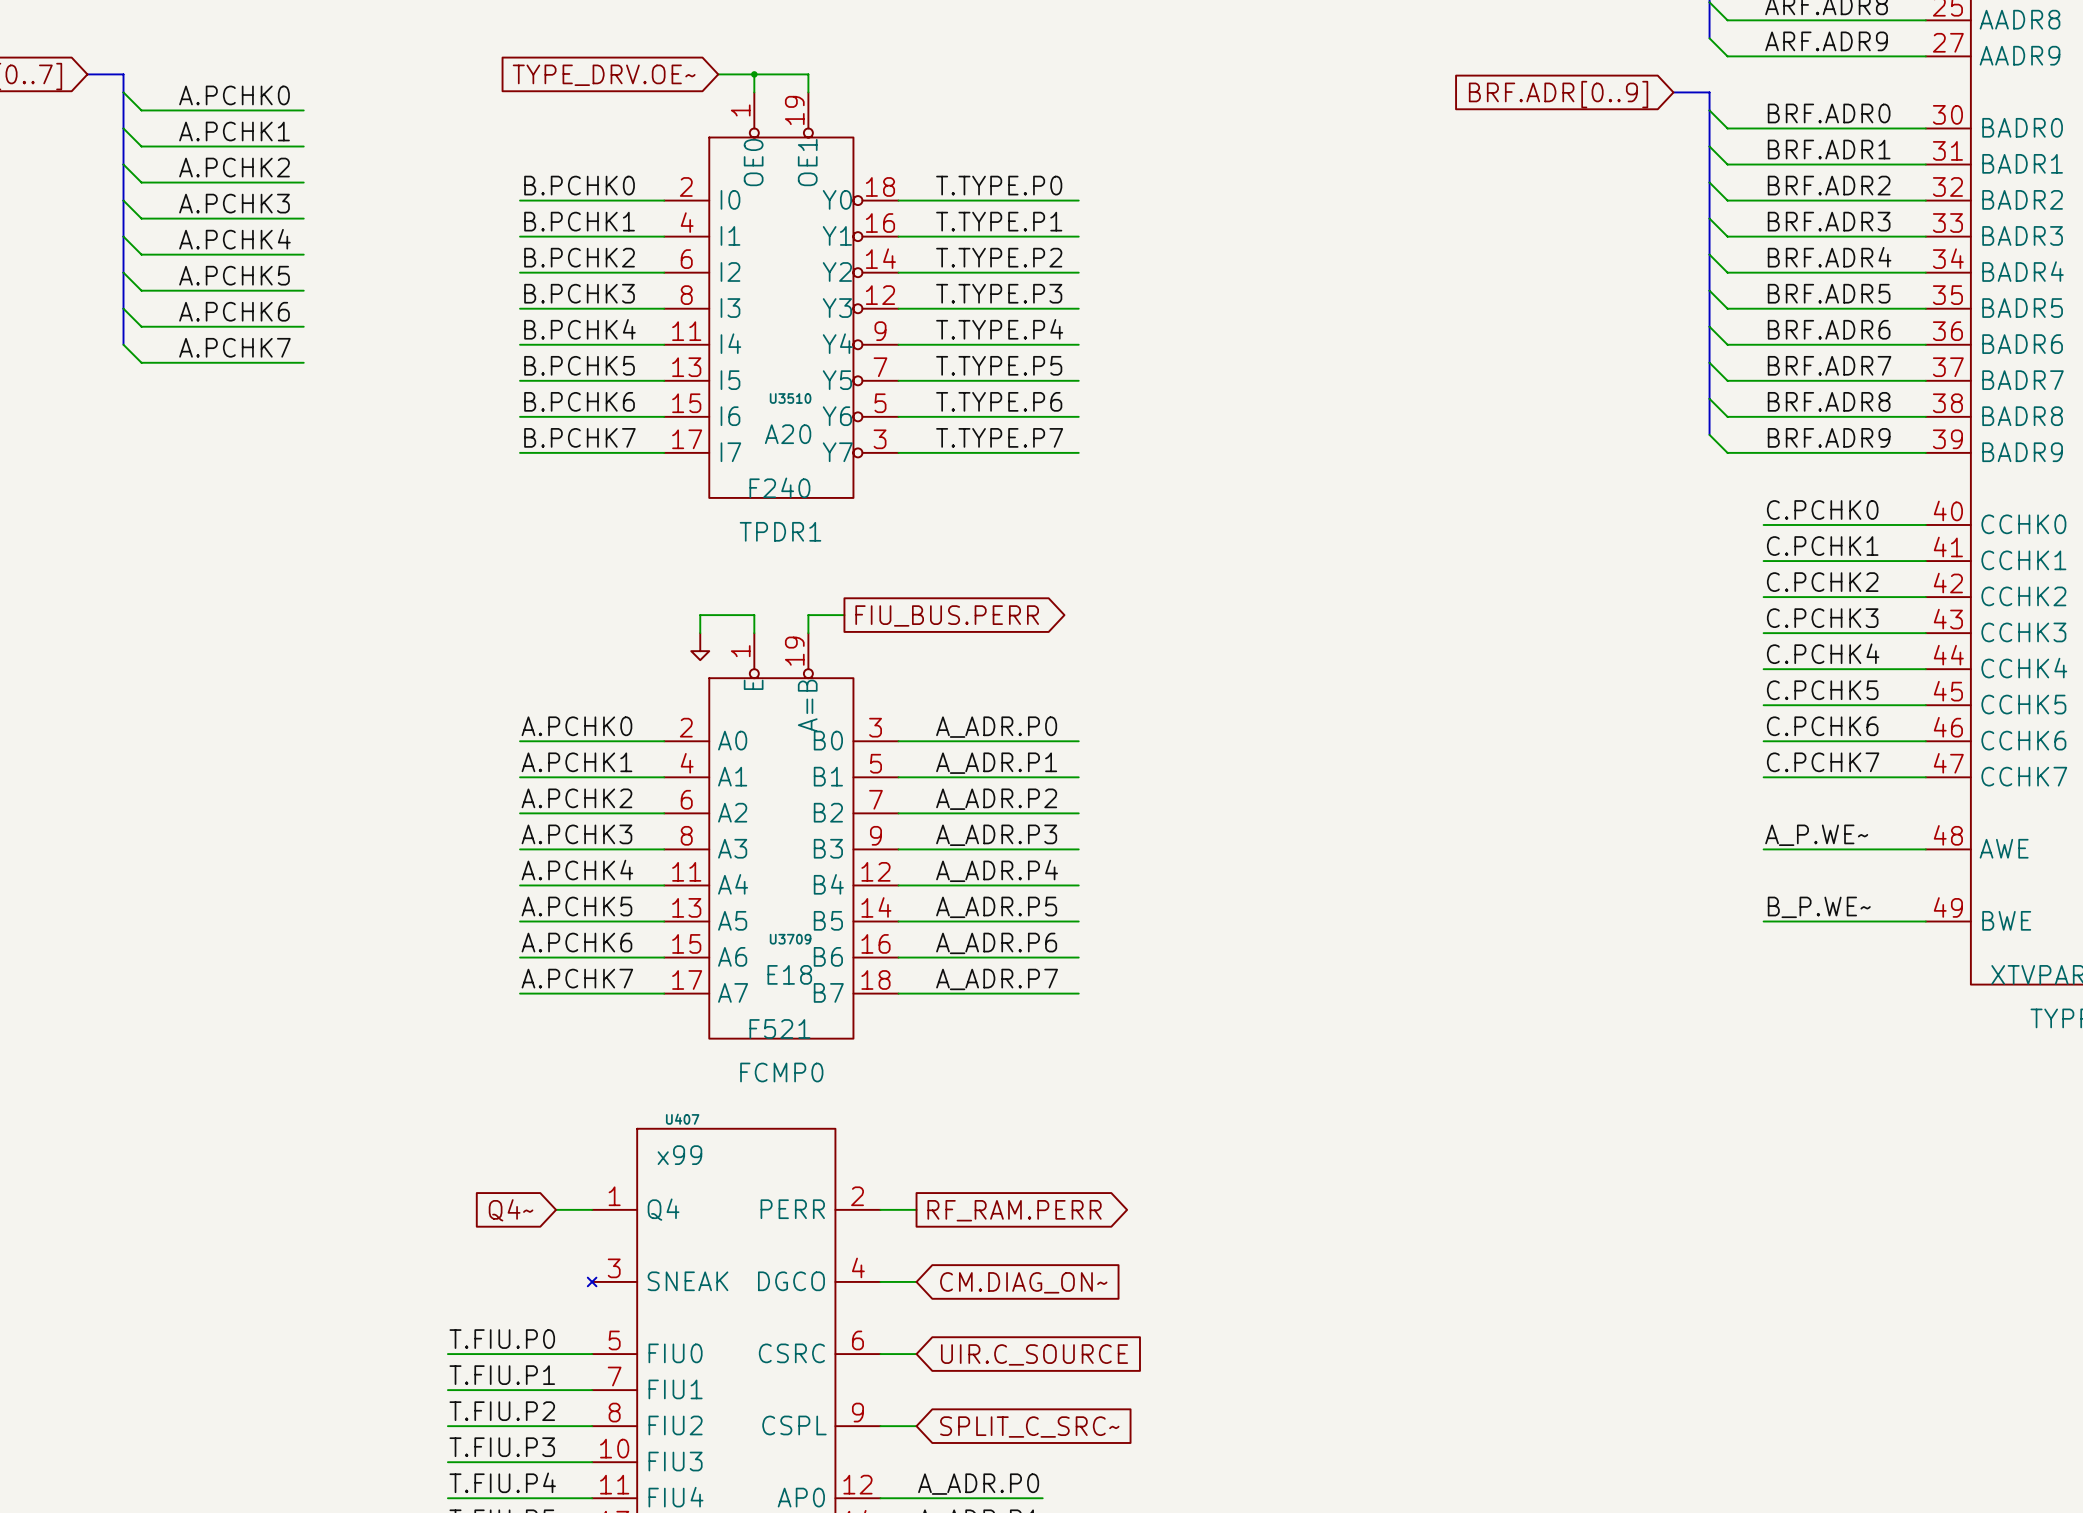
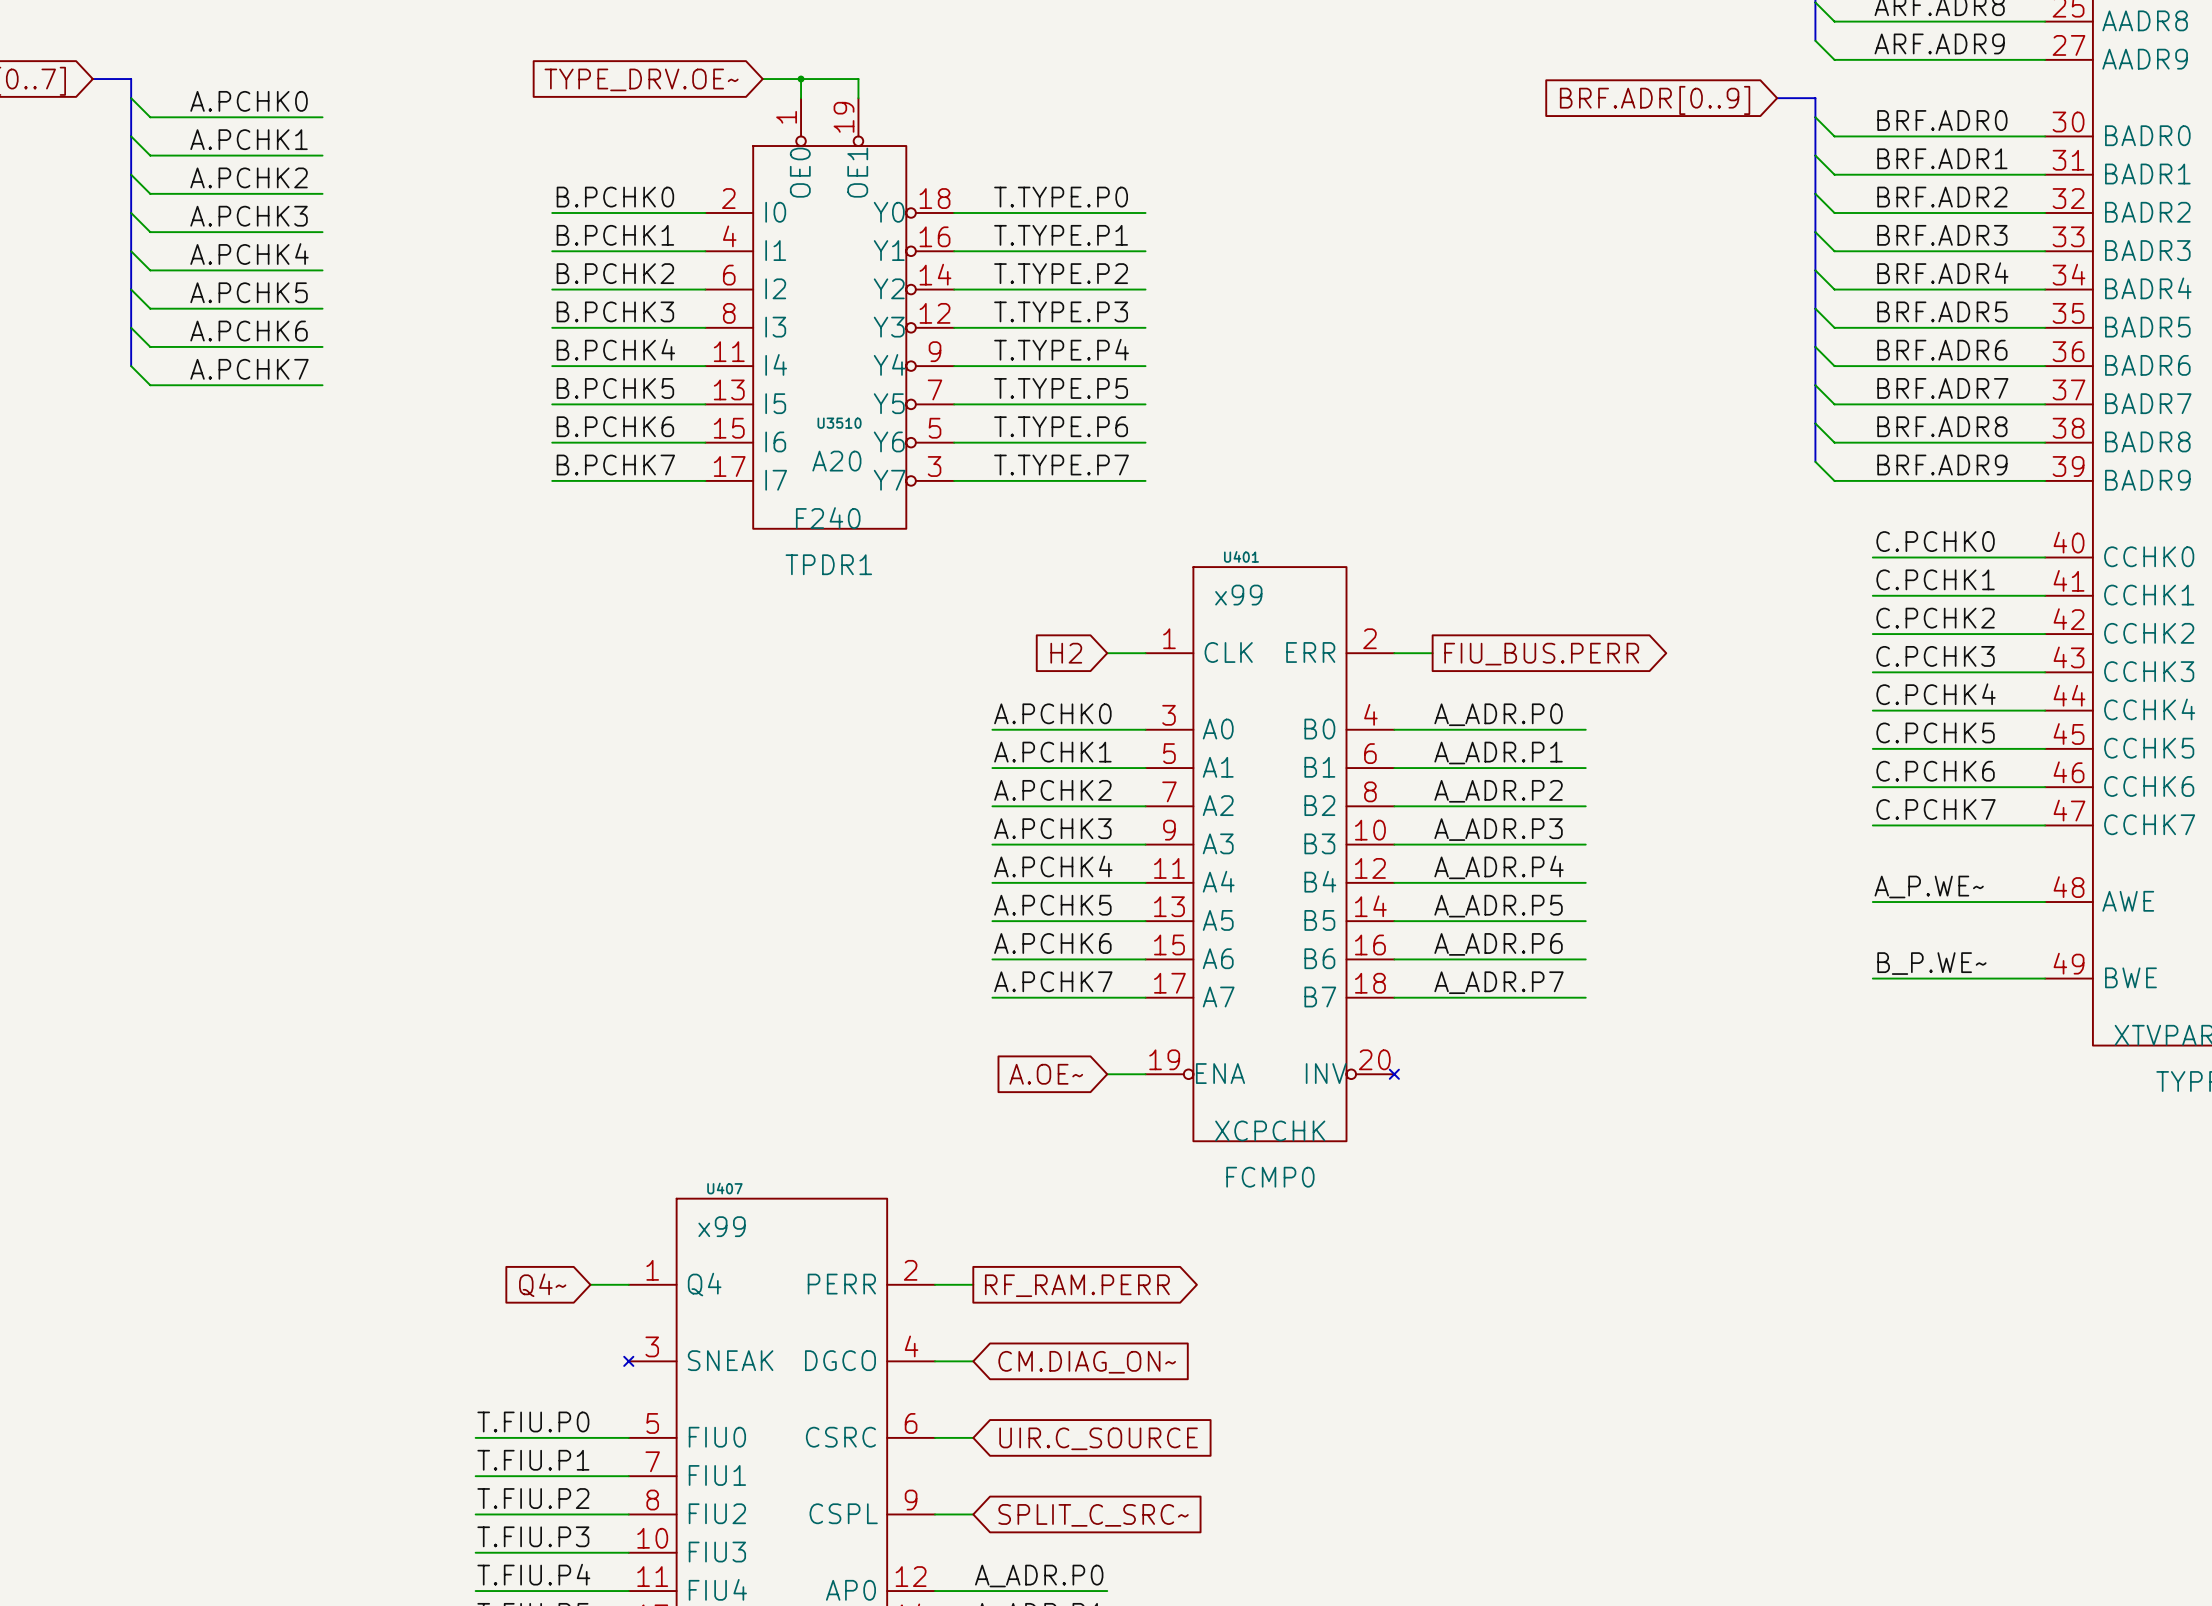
wire: (844, 615) (808, 615) (808, 633) -> none
global label: FIU_BUS.PERR (947, 615) -> none
global label: none -> H2 (1066, 653)
wire: none -> (1107, 653) (1145, 653)
wire: none -> (1394, 653) (1432, 653)
global label: none -> FIU_BUS.PERR (1541, 654)
wire: (700, 633) (700, 615) (754, 615) (754, 633) -> none
power symbol: (700, 646) -> none
label: none -> A.PCHK0 (1052, 713)
label: none -> A_ADR.P0 (1498, 714)
wire: none -> (992, 729) (1145, 729)
wire: none -> (1394, 729) (1585, 729)
label: none -> A.PCHK1 (1052, 752)
label: none -> A_ADR.P1 (1498, 753)
wire: none -> (992, 768) (1145, 768)
wire: none -> (1394, 768) (1585, 768)
label: A.PCHK0 (576, 726) -> none
label: A_ADR.P0 (996, 727) -> none
wire: (520, 741) (664, 741) -> none
wire: (898, 741) (1078, 741) -> none
label: none -> A.PCHK2 (1052, 790)
label: none -> A_ADR.P2 (1498, 791)
wire: none -> (992, 806) (1145, 806)
wire: none -> (1394, 806) (1585, 806)
label: A.PCHK1 (576, 762) -> none
label: A_ADR.P1 (996, 763) -> none
wire: (520, 777) (664, 777) -> none
wire: (898, 777) (1078, 777) -> none
label: none -> A.PCHK3 (1052, 828)
label: none -> A_ADR.P3 (1498, 829)
wire: none -> (992, 844) (1145, 844)
wire: none -> (1394, 844) (1585, 844)
label: A.PCHK2 (576, 798) -> none
label: A_ADR.P2 (996, 799) -> none
U401: none -> XCPCHK (1269, 854)
wire: (520, 813) (664, 813) -> none
wire: (898, 813) (1078, 813) -> none
label: none -> A.PCHK4 (1053, 866)
label: none -> A_ADR.P4 (1499, 867)
wire: none -> (992, 882) (1145, 882)
wire: none -> (1394, 882) (1585, 882)
label: A.PCHK3 (576, 834) -> none
U3709: F521 (781, 835) -> none
label: A_ADR.P3 (996, 835) -> none
wire: (520, 849) (664, 849) -> none
wire: (898, 849) (1078, 849) -> none
label: none -> A.PCHK5 (1052, 905)
label: none -> A_ADR.P5 (1498, 906)
wire: none -> (992, 921) (1145, 921)
wire: none -> (1394, 921) (1585, 921)
label: A.PCHK4 (577, 870) -> none
label: A_ADR.P4 (997, 870) -> none
wire: (520, 885) (664, 885) -> none
wire: (898, 885) (1078, 885) -> none
label: none -> A.PCHK6 (1052, 943)
label: none -> A_ADR.P6 (1498, 944)
wire: none -> (992, 959) (1145, 959)
wire: none -> (1394, 959) (1585, 959)
label: A.PCHK5 (576, 906) -> none
label: A_ADR.P5 (996, 907) -> none
wire: (520, 921) (664, 921) -> none
wire: (898, 921) (1078, 921) -> none
label: none -> A.PCHK7 (1053, 981)
label: none -> A_ADR.P7 (1499, 982)
wire: none -> (992, 997) (1145, 997)
wire: none -> (1394, 997) (1585, 997)
label: A.PCHK6 (576, 942) -> none
label: A_ADR.P6 (996, 943) -> none
wire: (520, 957) (664, 957) -> none
wire: (898, 957) (1078, 957) -> none
label: A.PCHK7 (577, 978) -> none
label: A_ADR.P7 (997, 979) -> none
wire: (520, 993) (664, 993) -> none
wire: (898, 993) (1078, 993) -> none
global label: none -> A.OE~ (1046, 1074)
wire: none -> (1107, 1074) (1145, 1074)
no-connect mark: none -> (1394, 1074)

